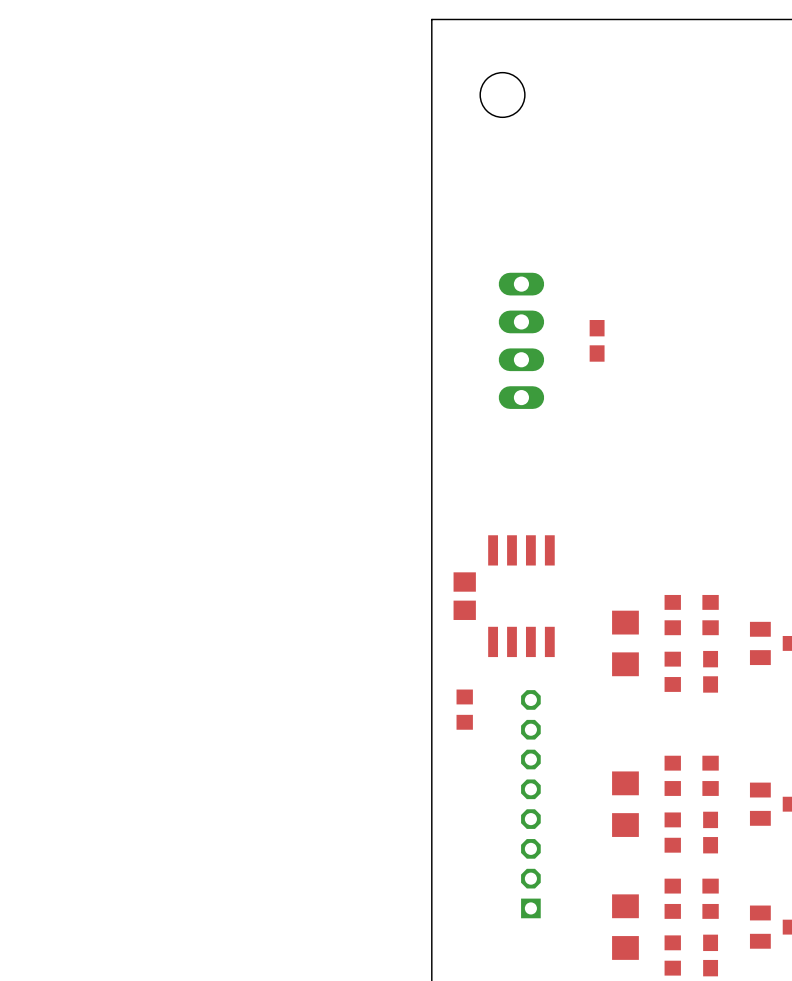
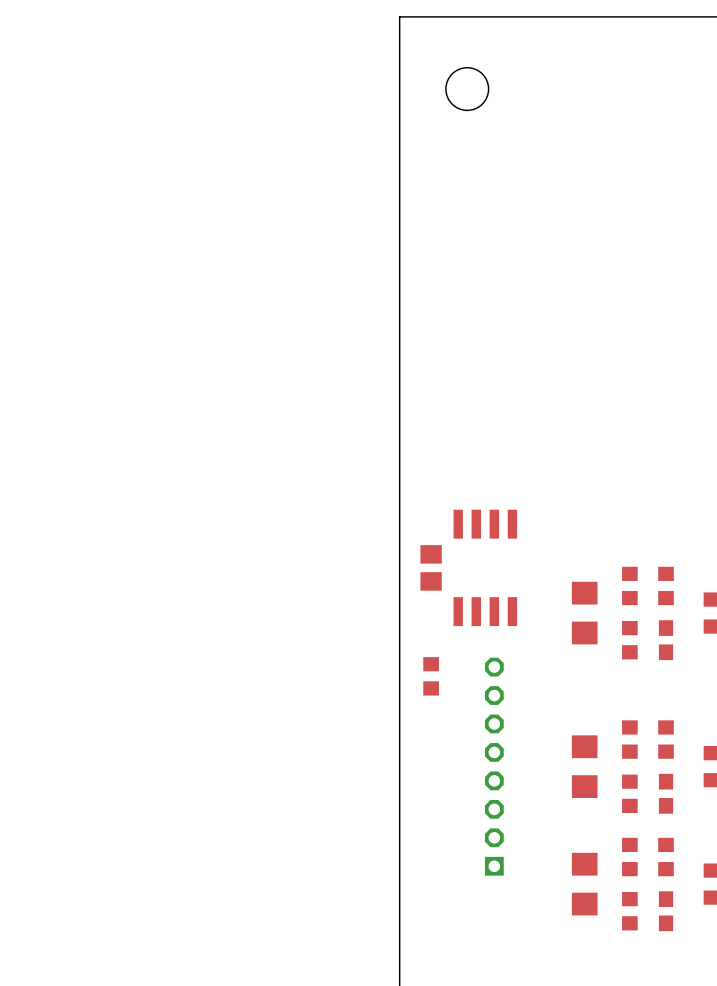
part: (521, 340) -> none
part: (597, 340) -> none

